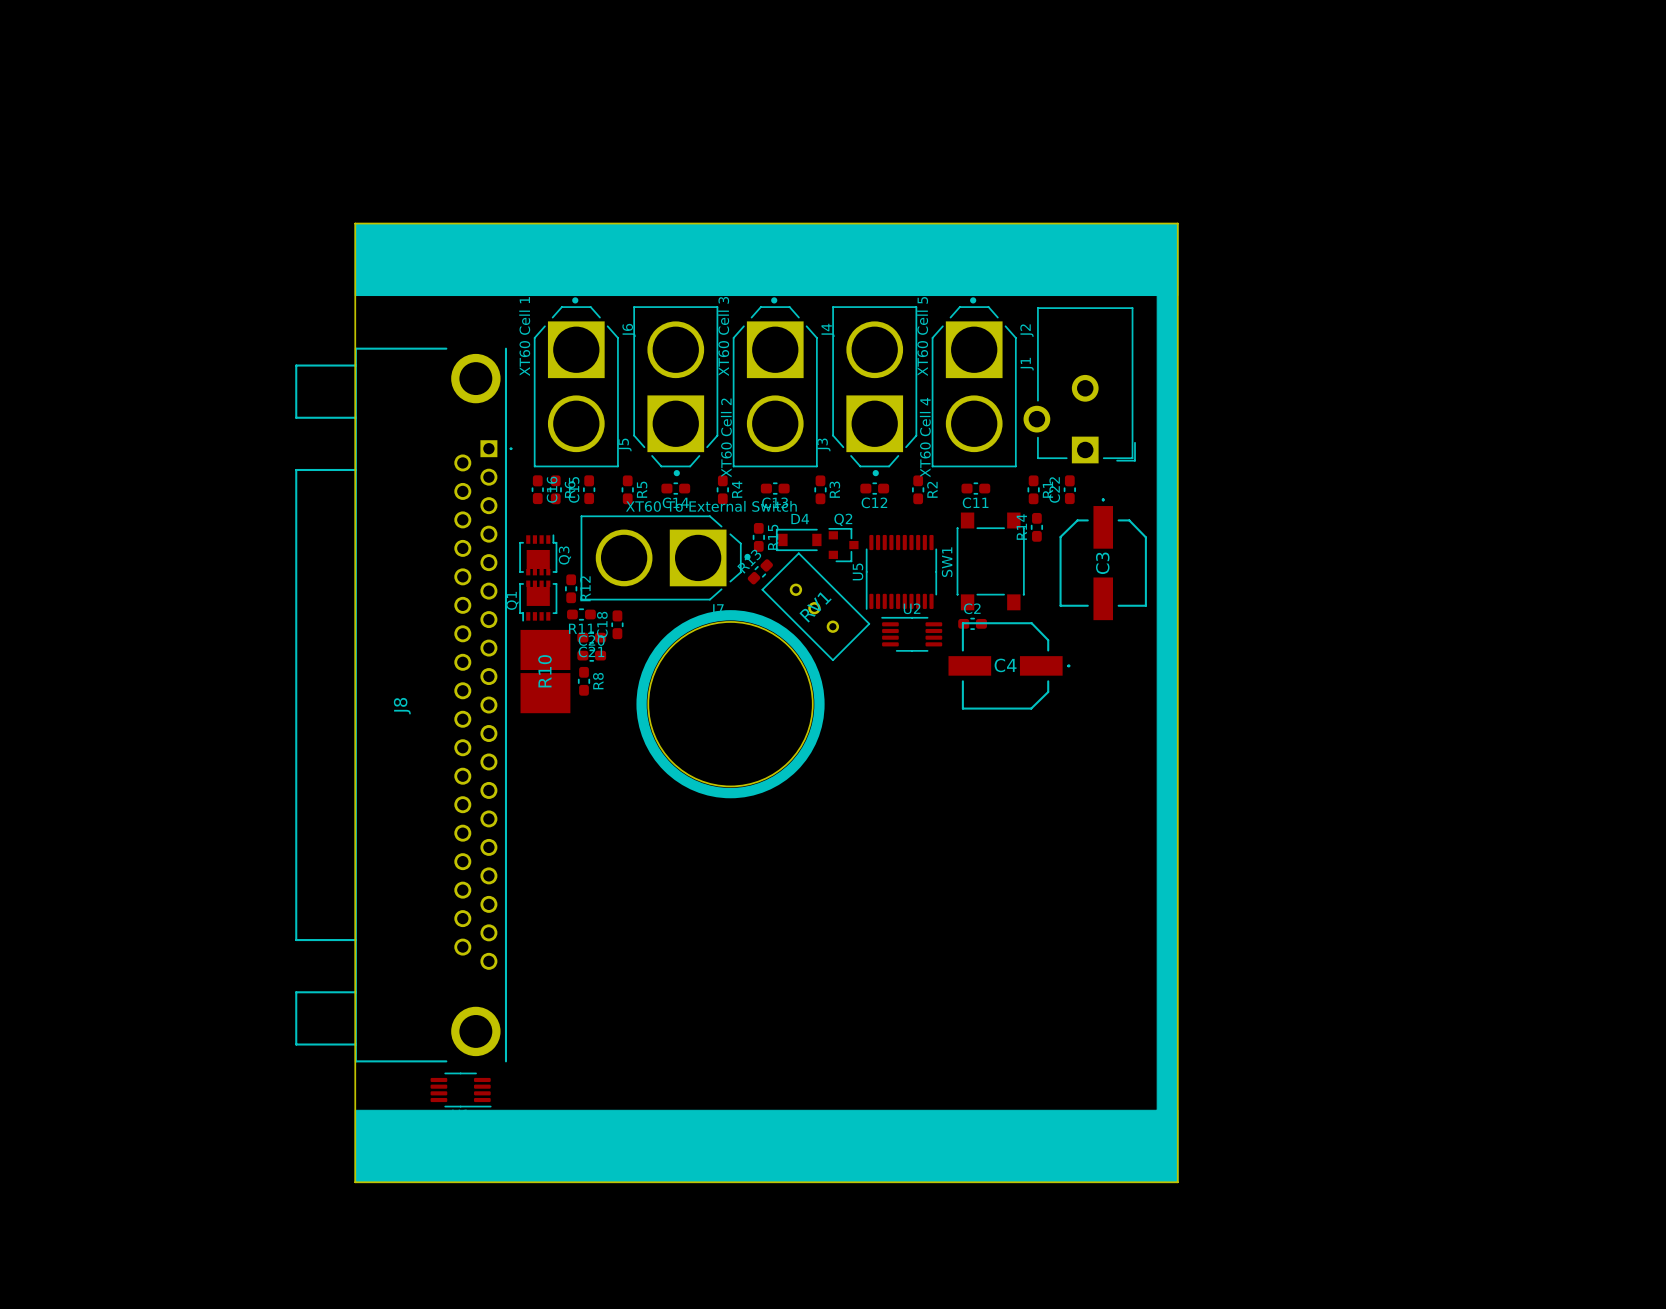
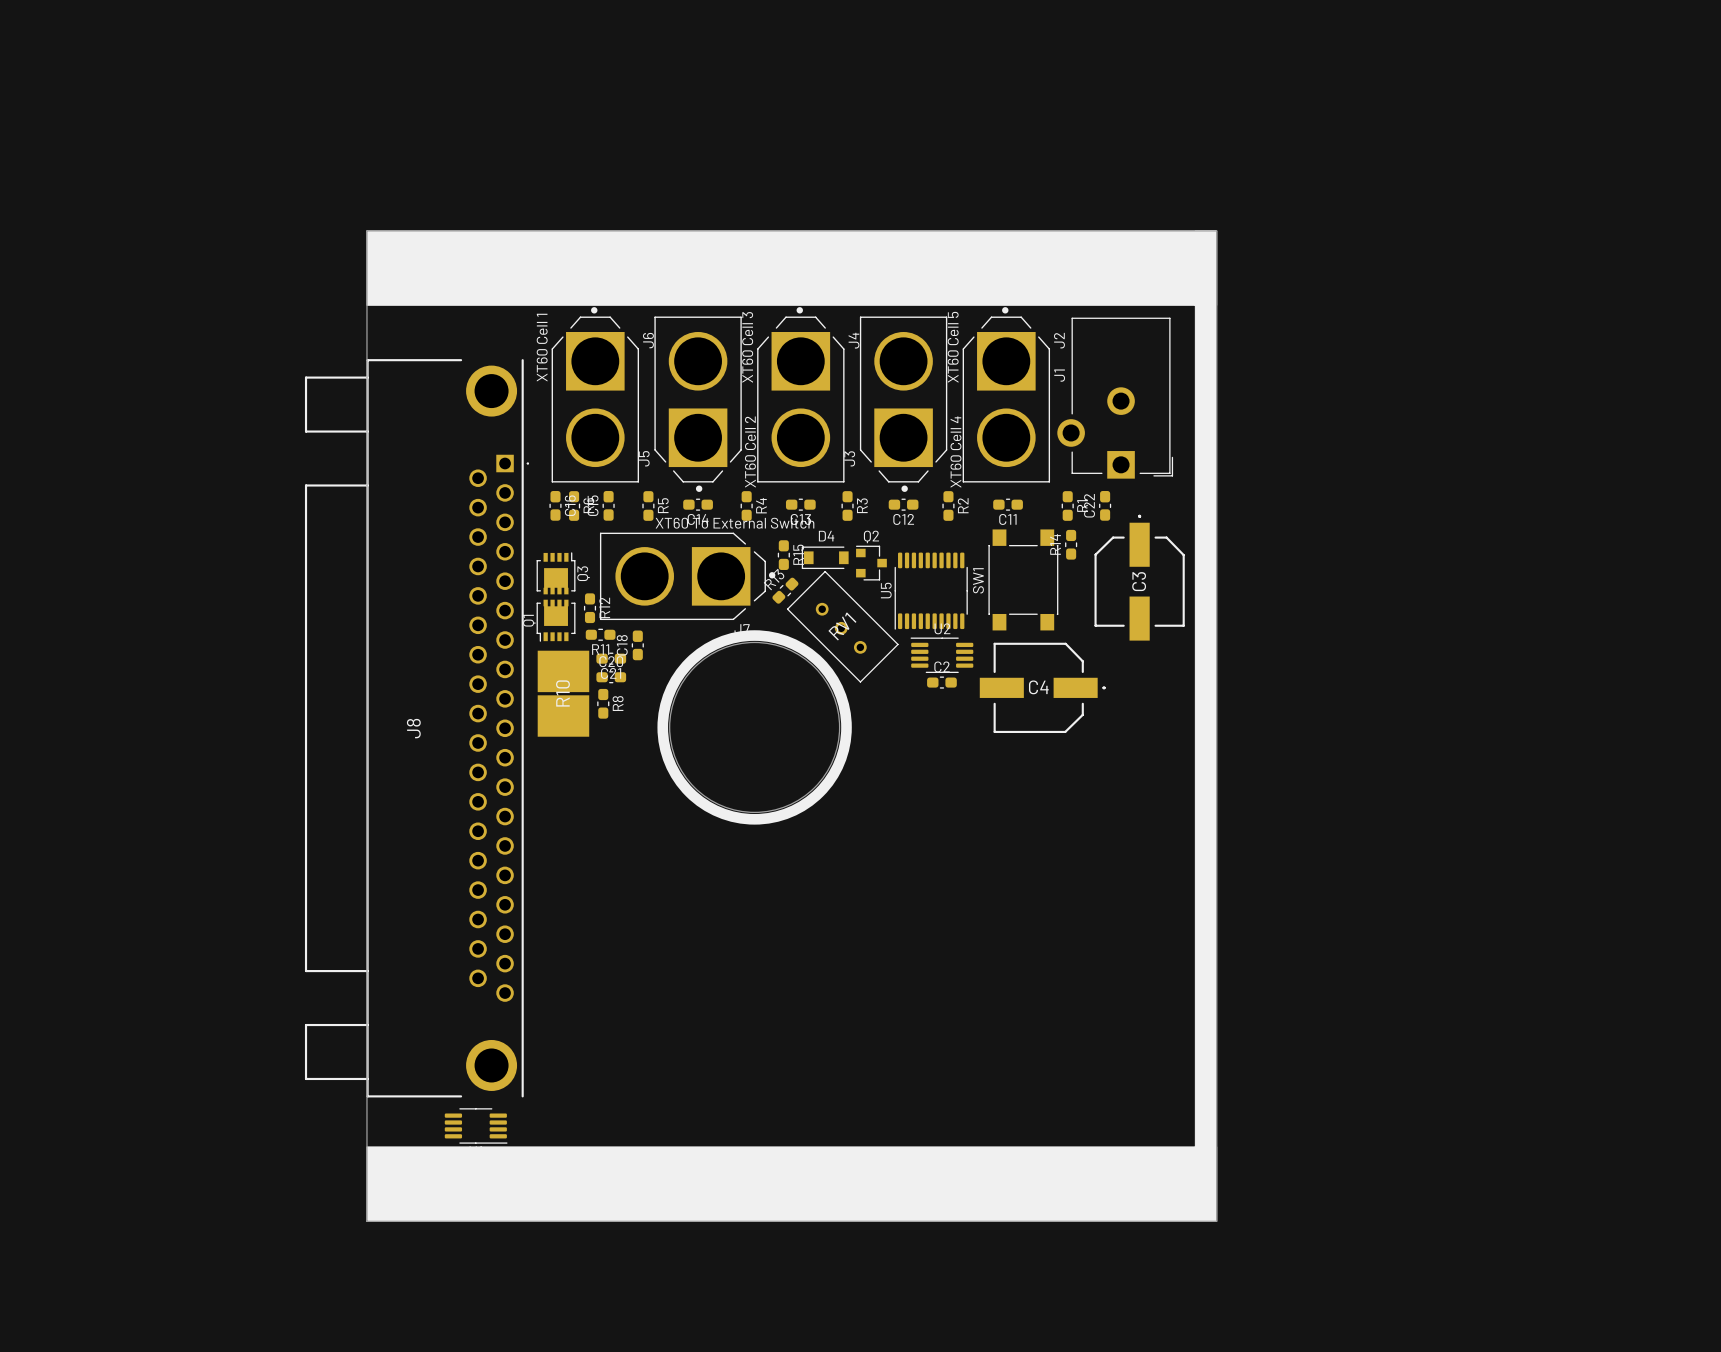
C2 position: (972, 623) -> (941, 682)

